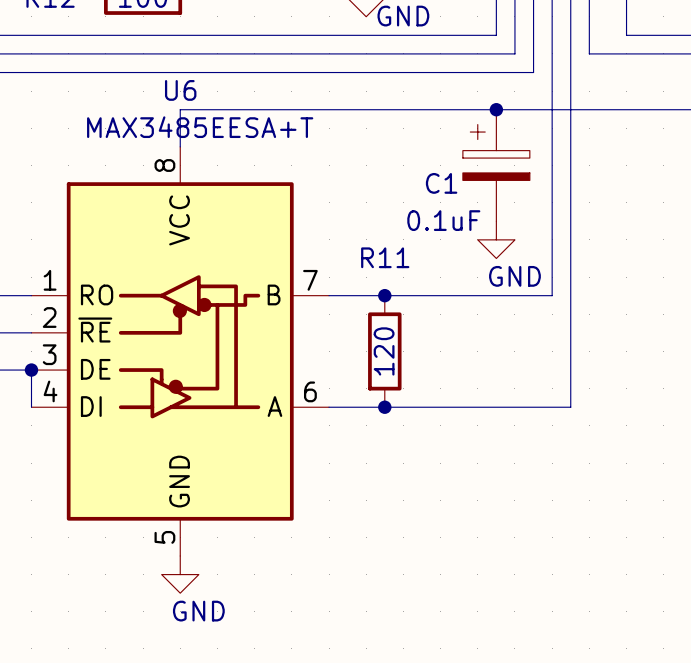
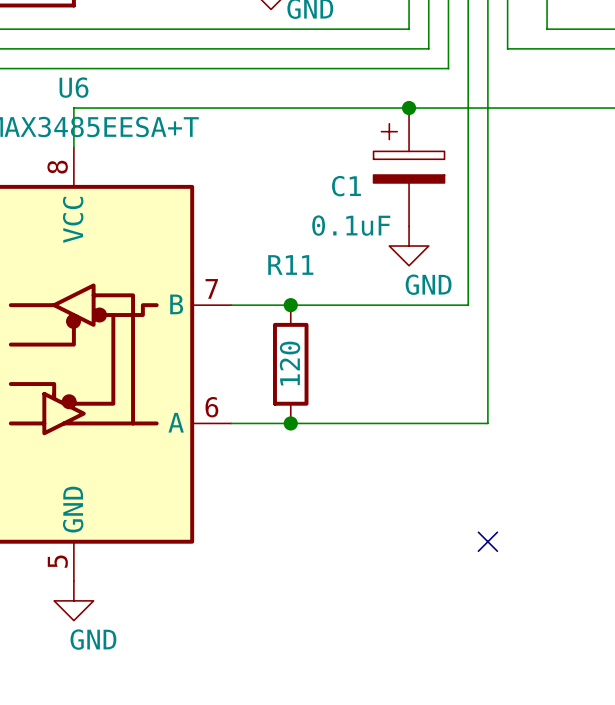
no-connect mark: none -> (487, 541)

